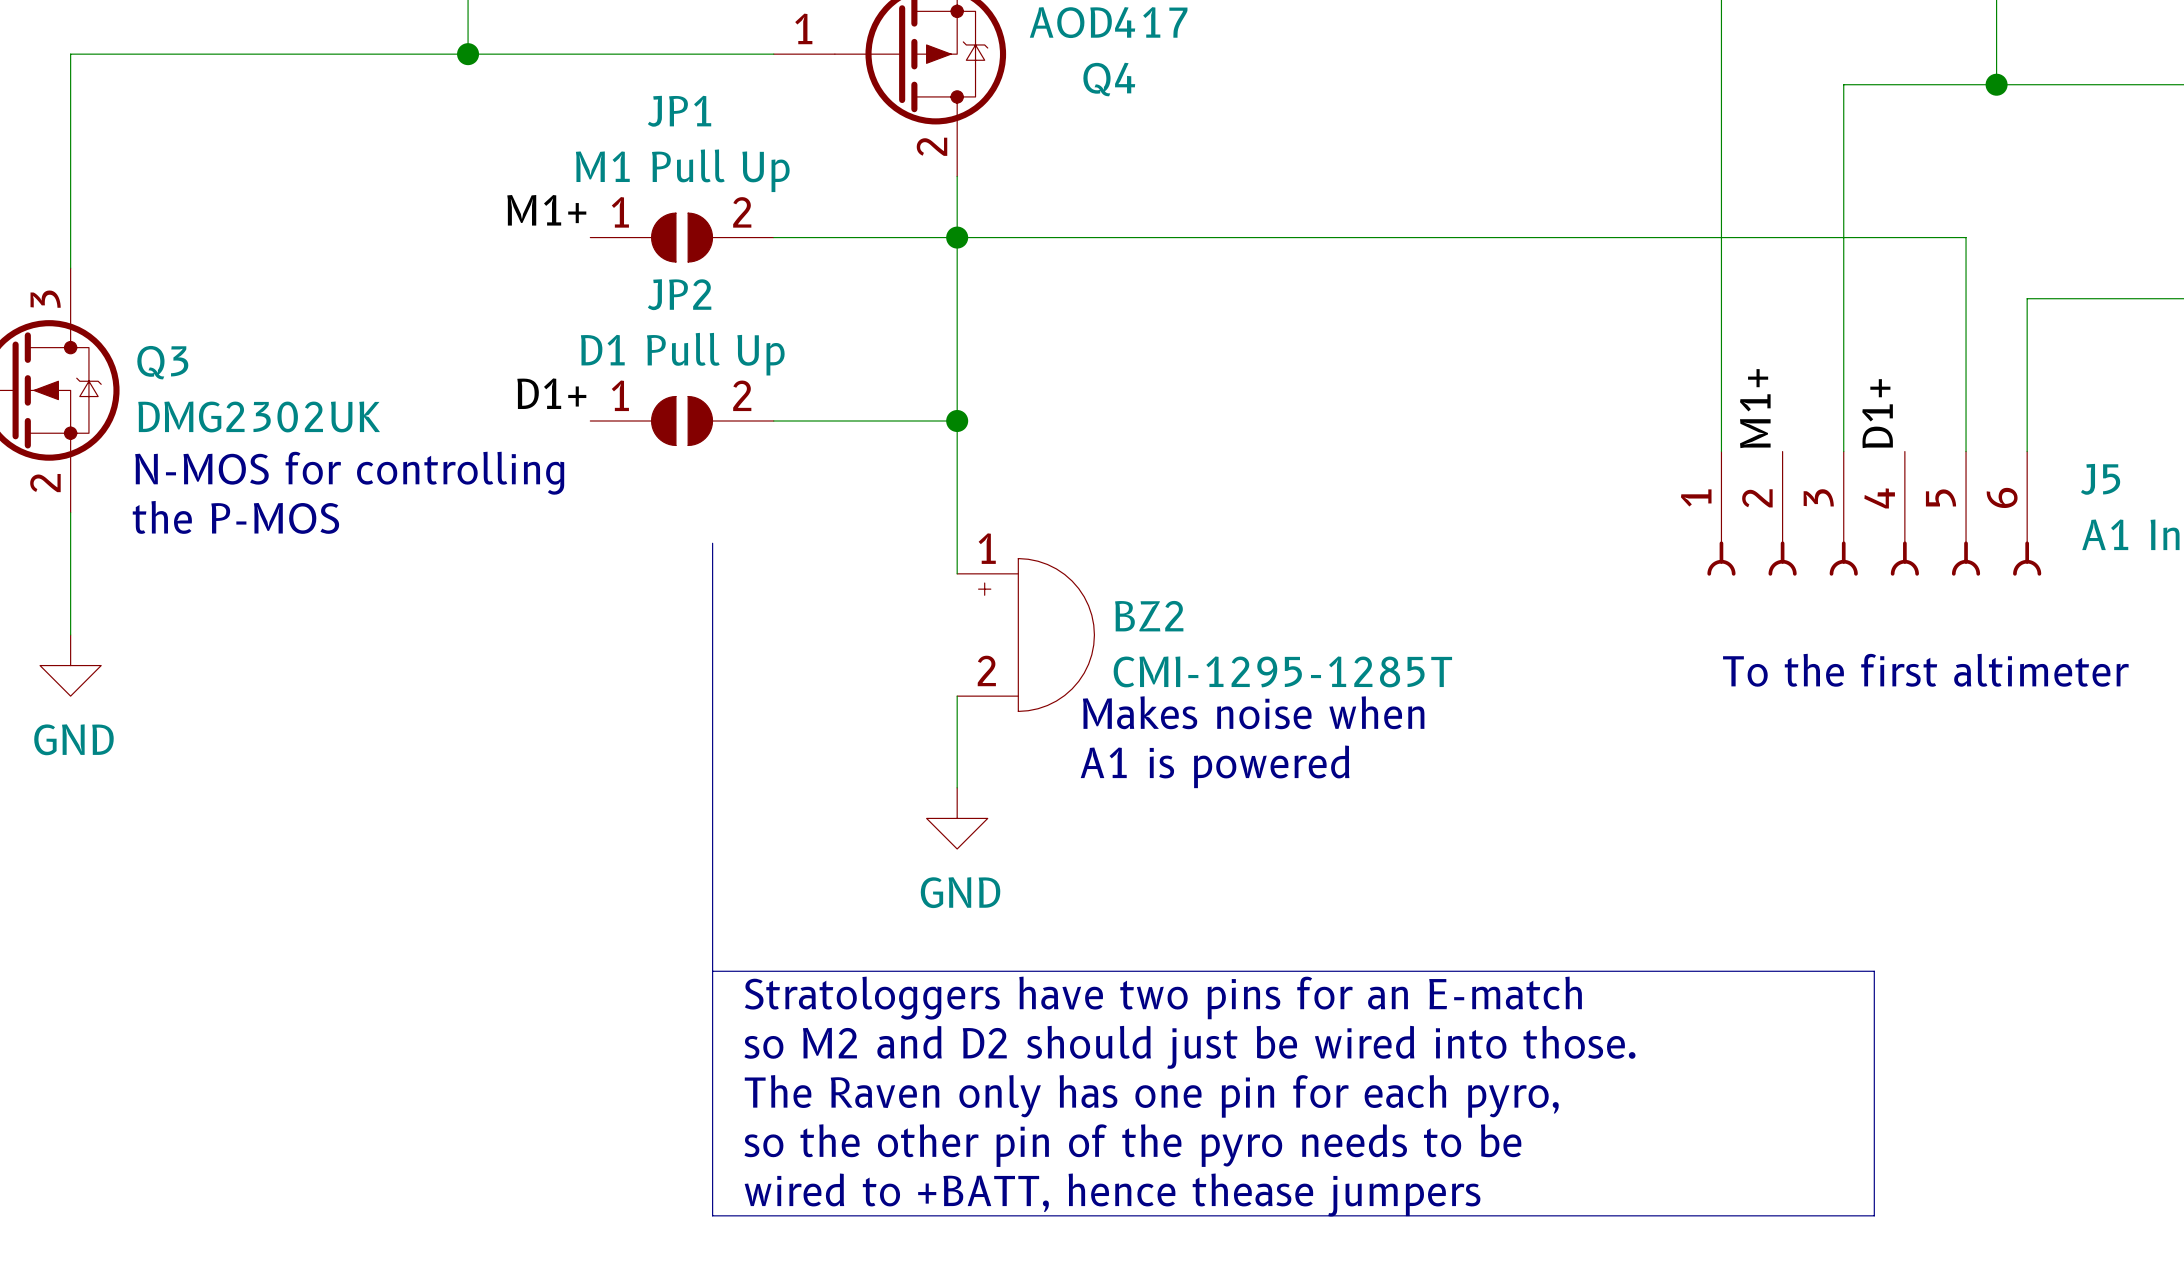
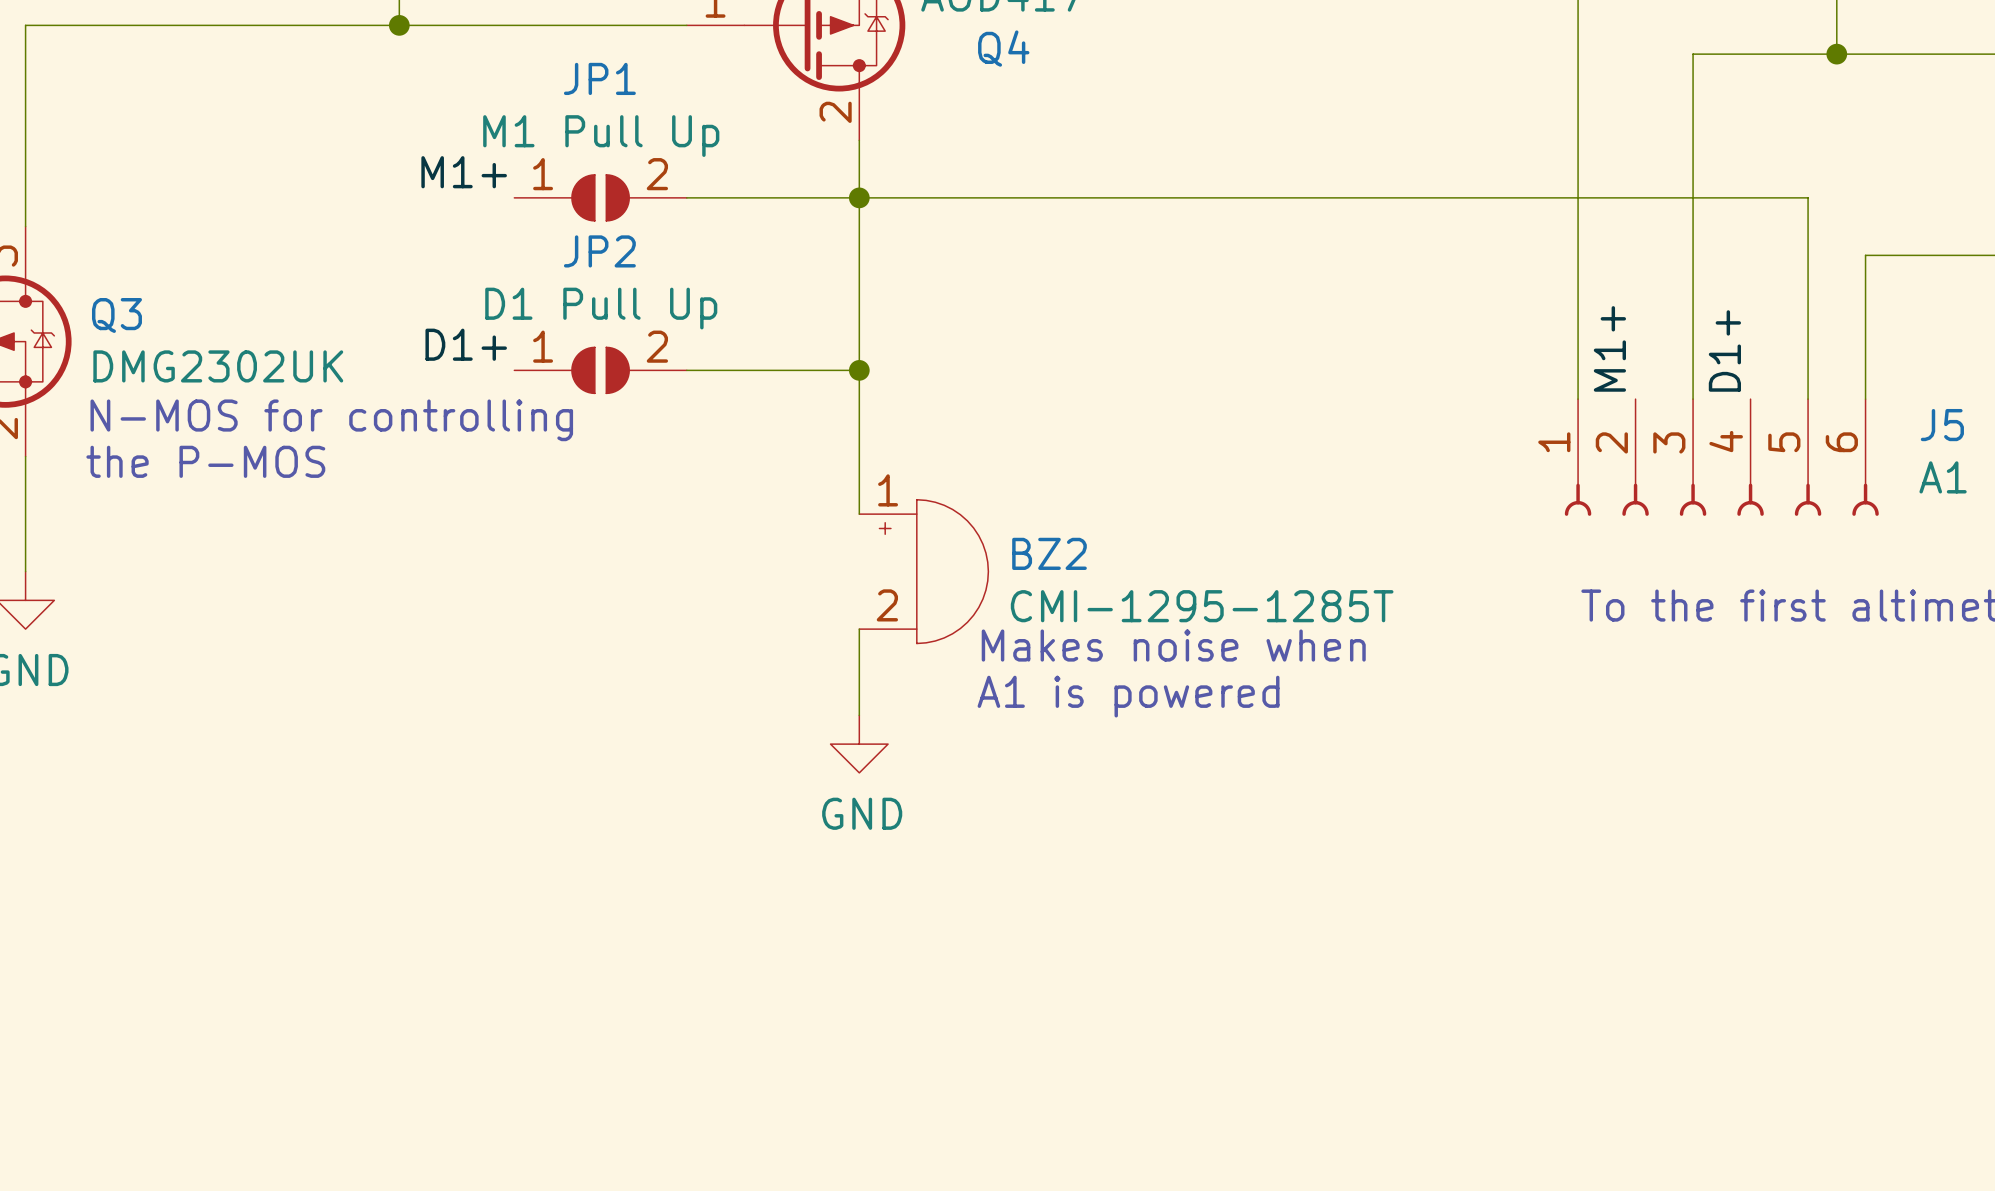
line: (712, 543) (712, 1215) (1874, 1215) (1874, 971) (712, 971) -> none
text: Stratologgers have two pins for an E-match (1163, 998) -> none
text: so M2 and D2 should just be wired into those. (1189, 1047) -> none
text: The Raven only has one pin for each pyro, (1151, 1096) -> none
text: so the other pin of the pyro needs to be (1132, 1145) -> none
text: wired to +BATT, hence thease jumpers (1112, 1194) -> none

